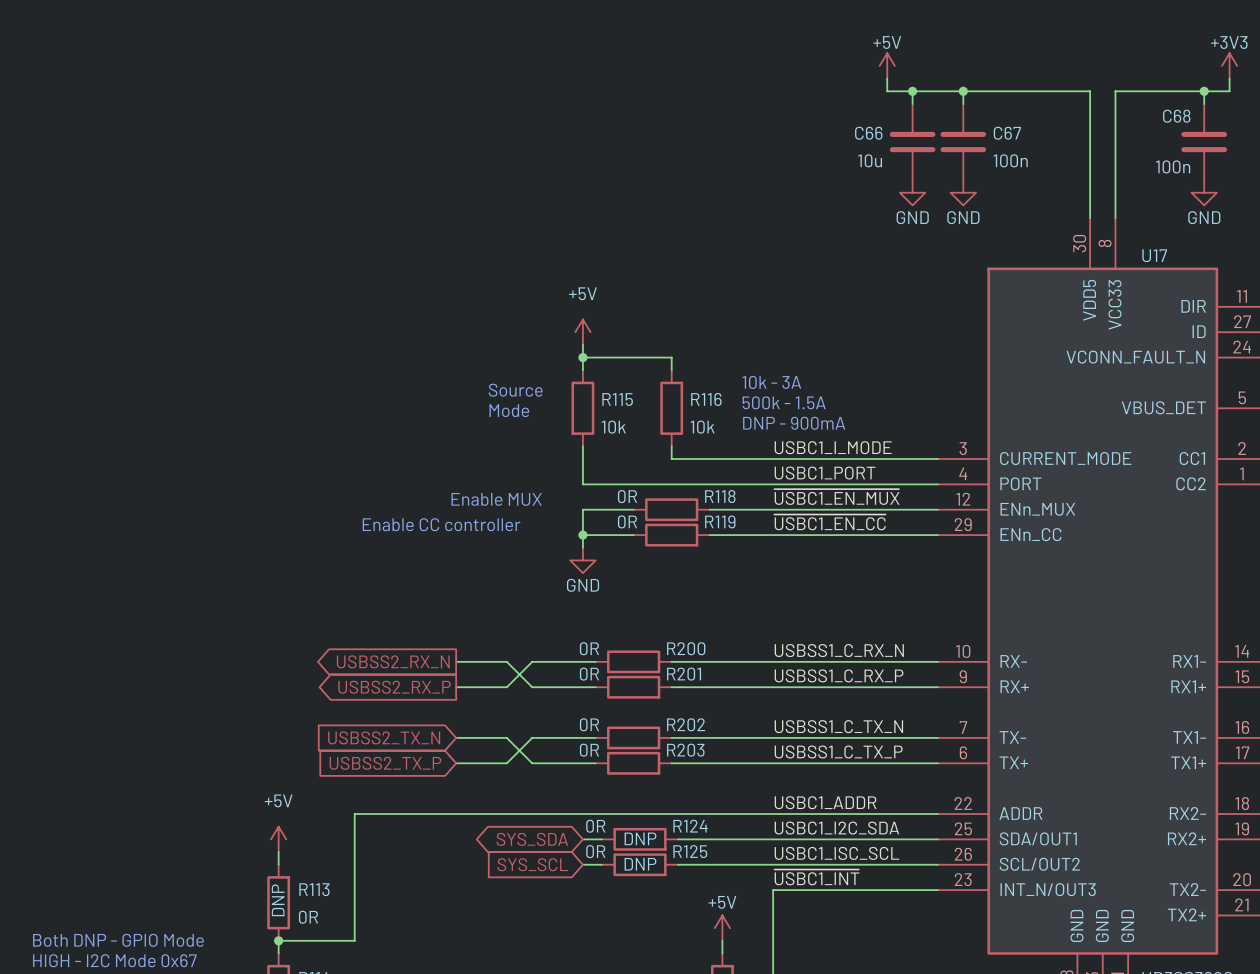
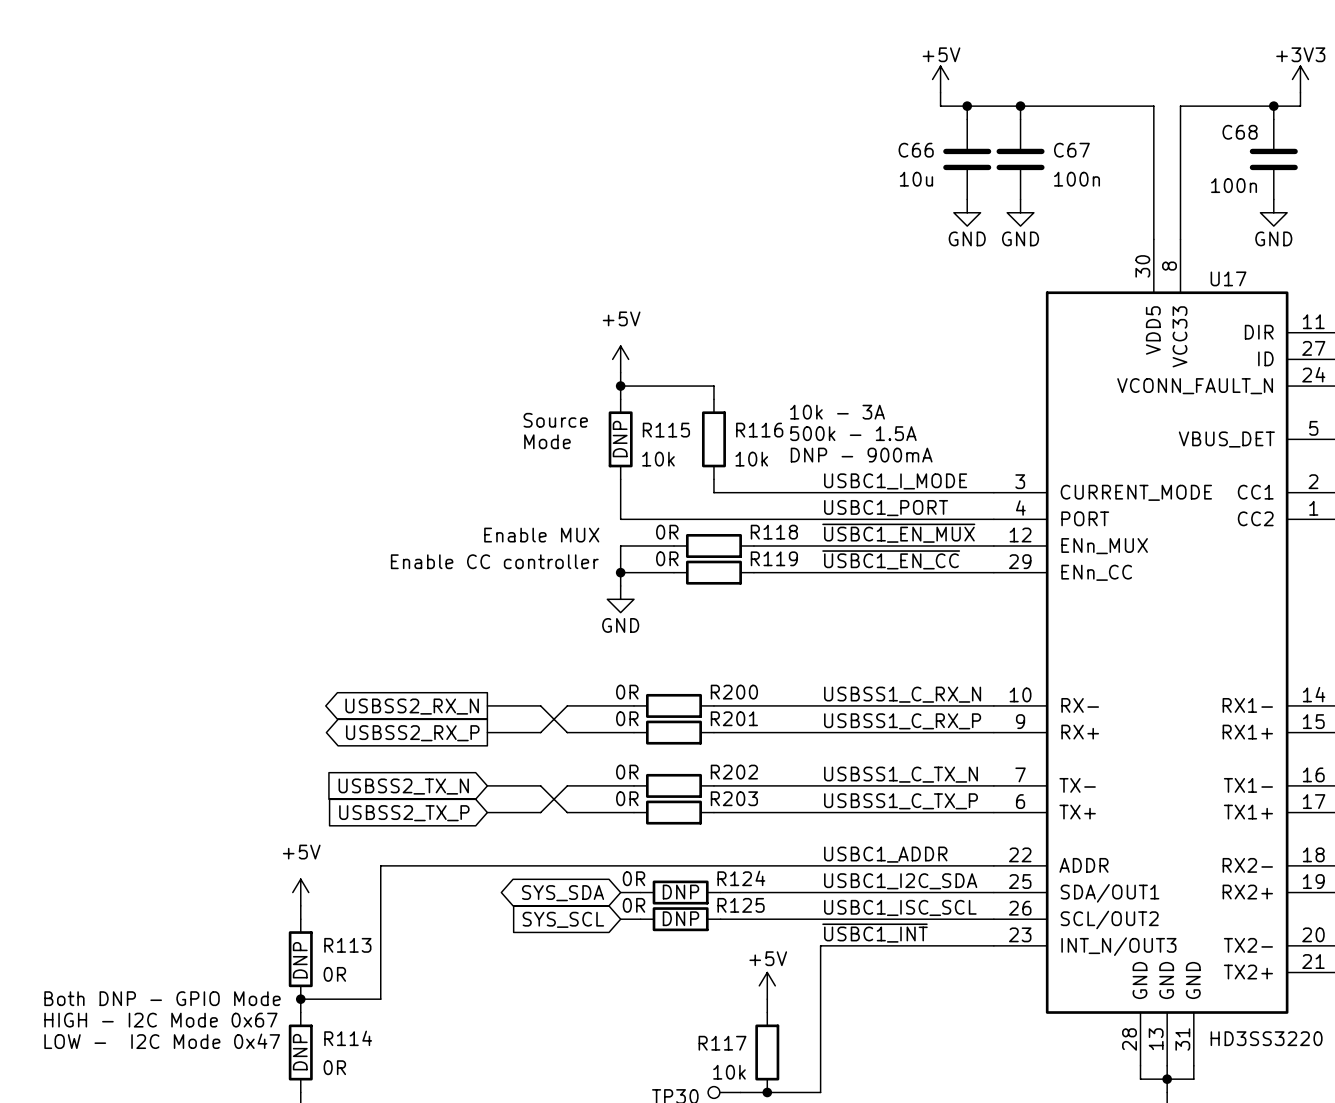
R115 text: none -> DNP (620, 439)

